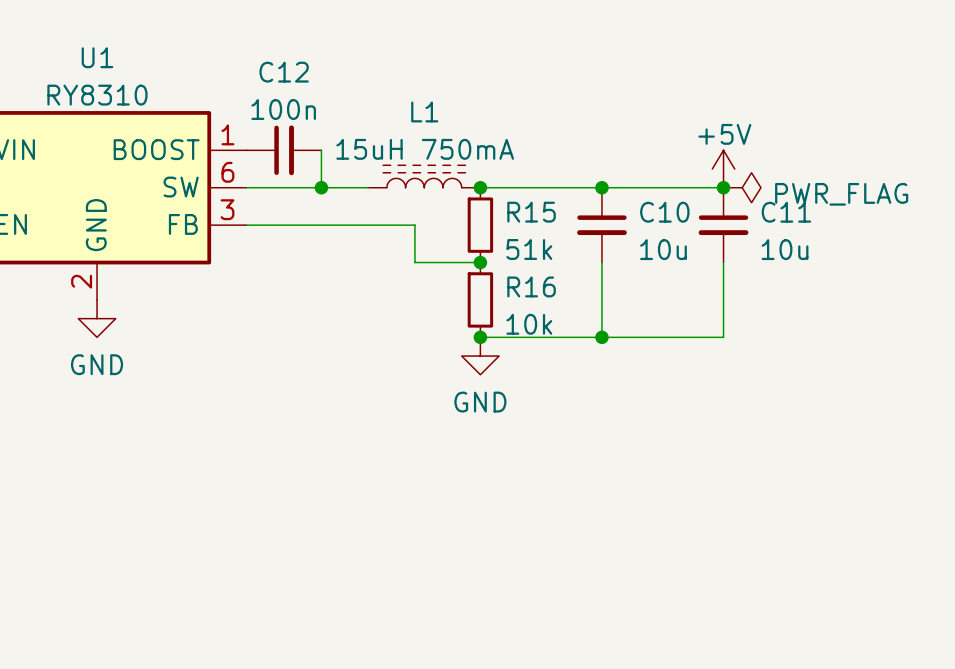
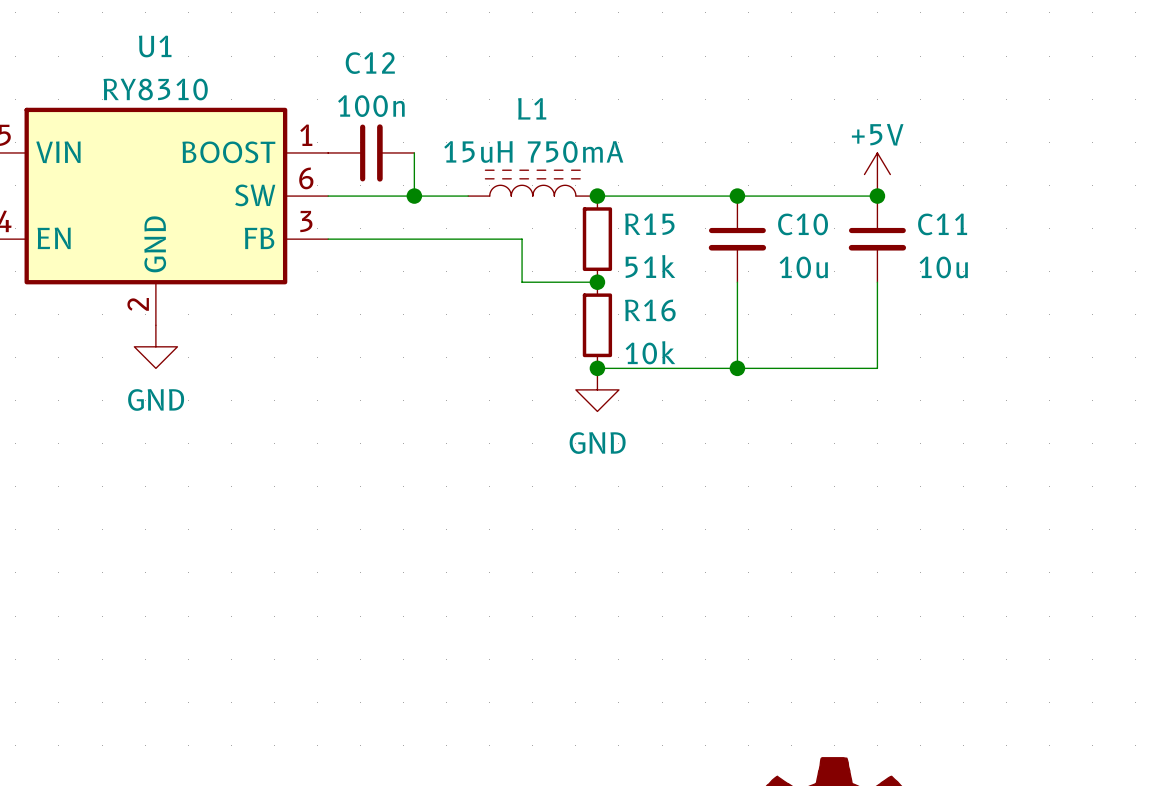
power symbol: PWR_FLAG (742, 187) -> none

